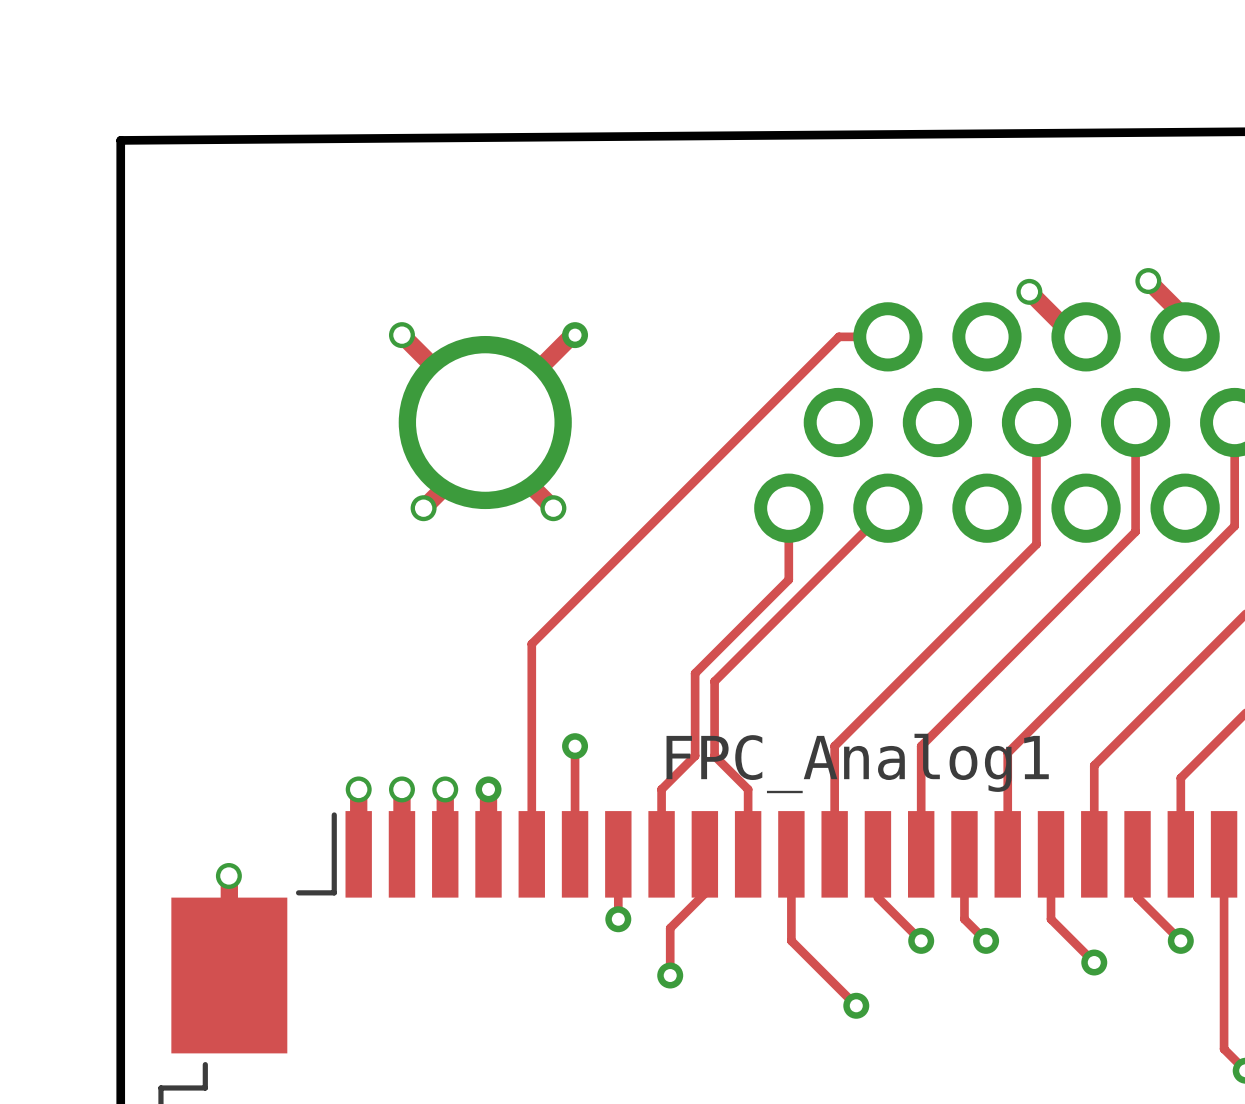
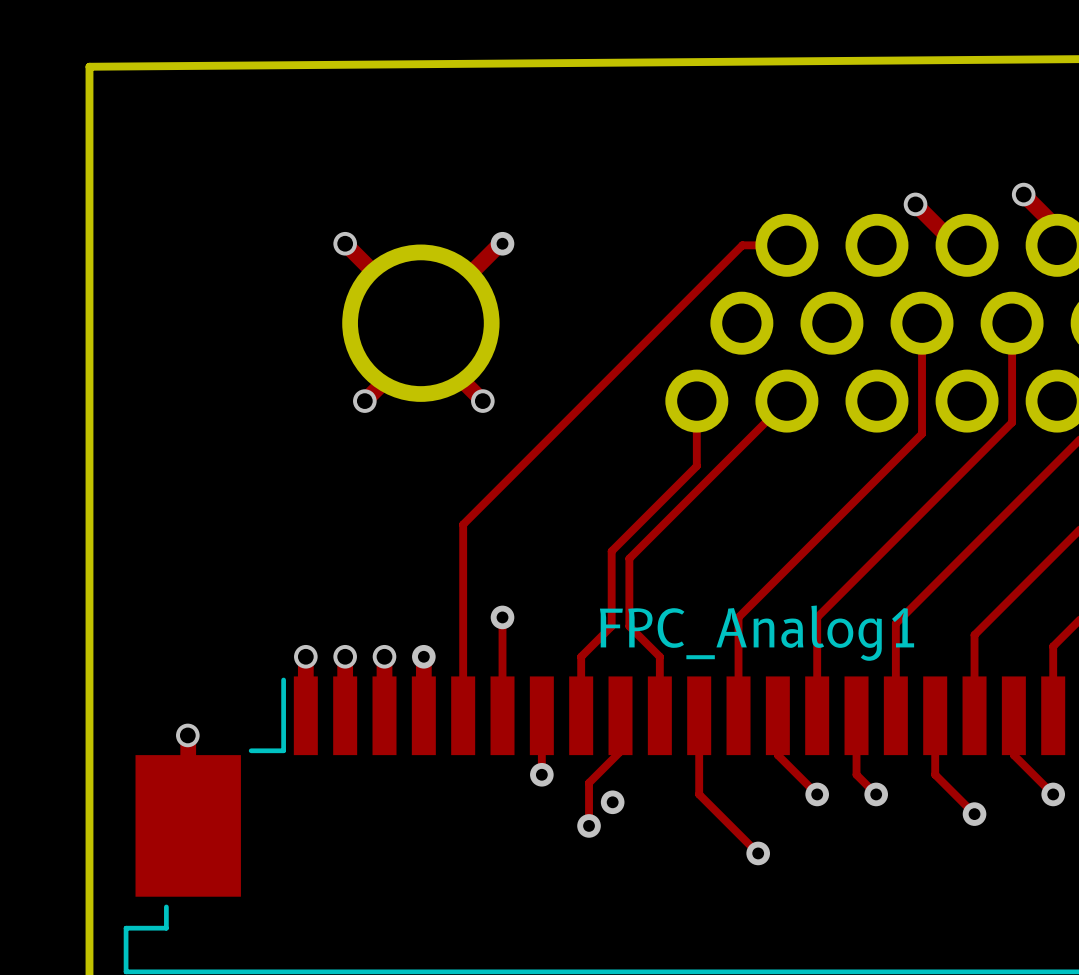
via: none -> (612, 802)

